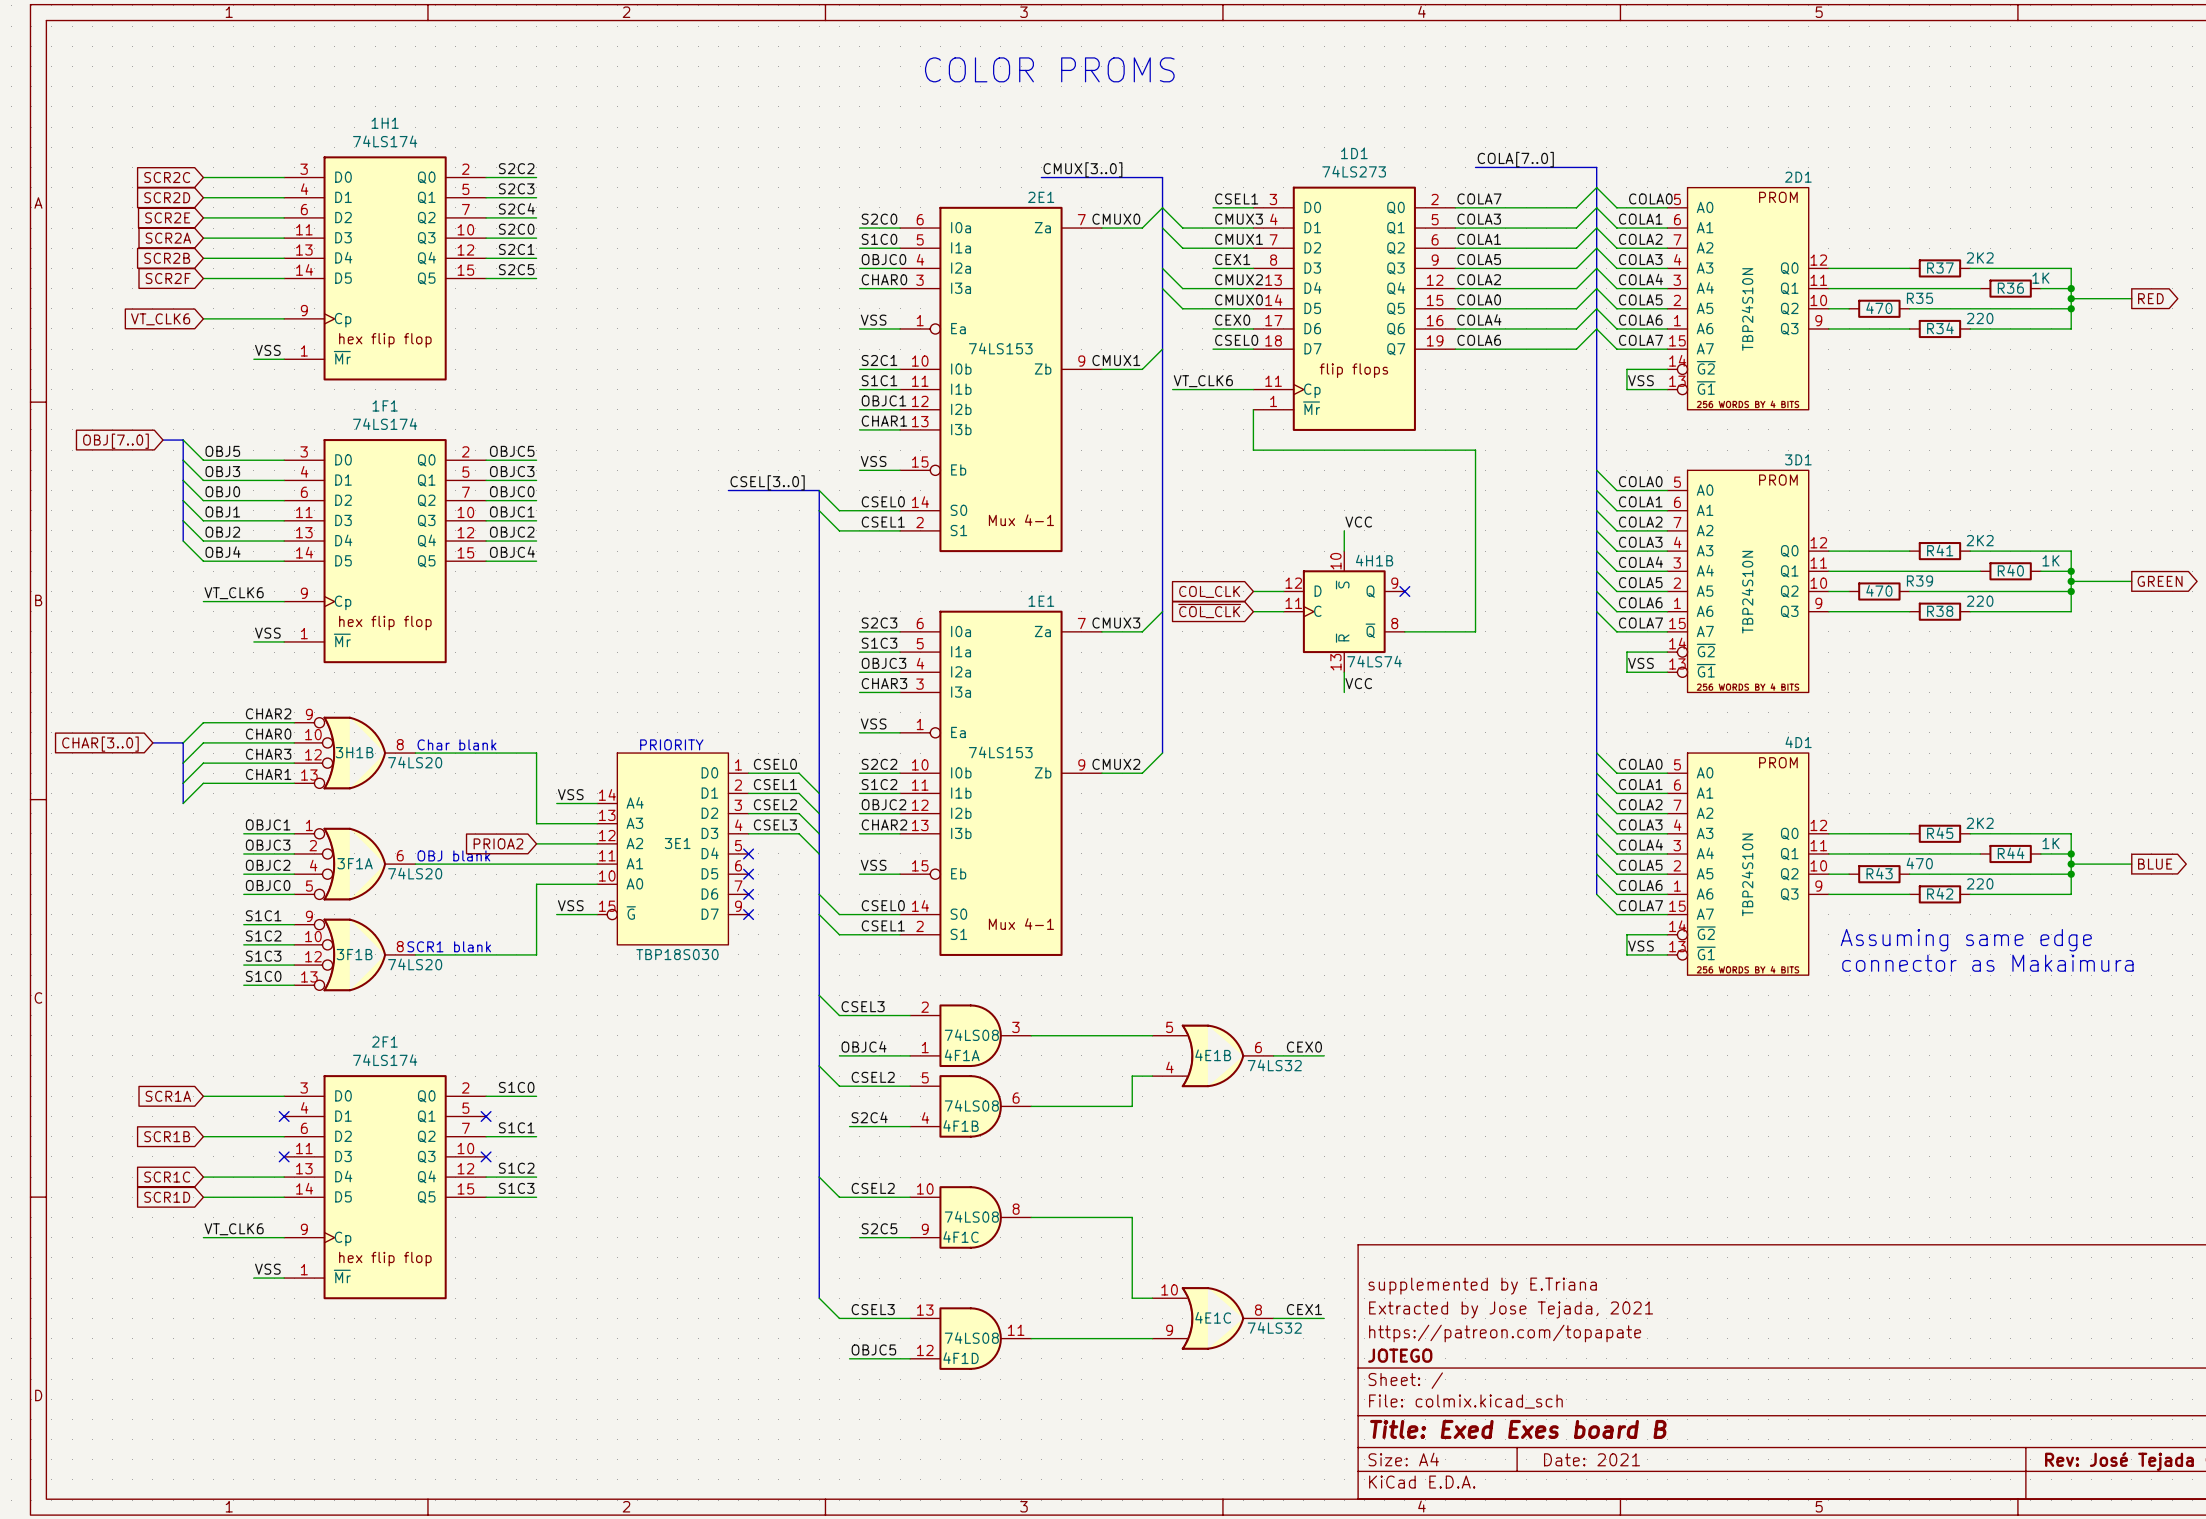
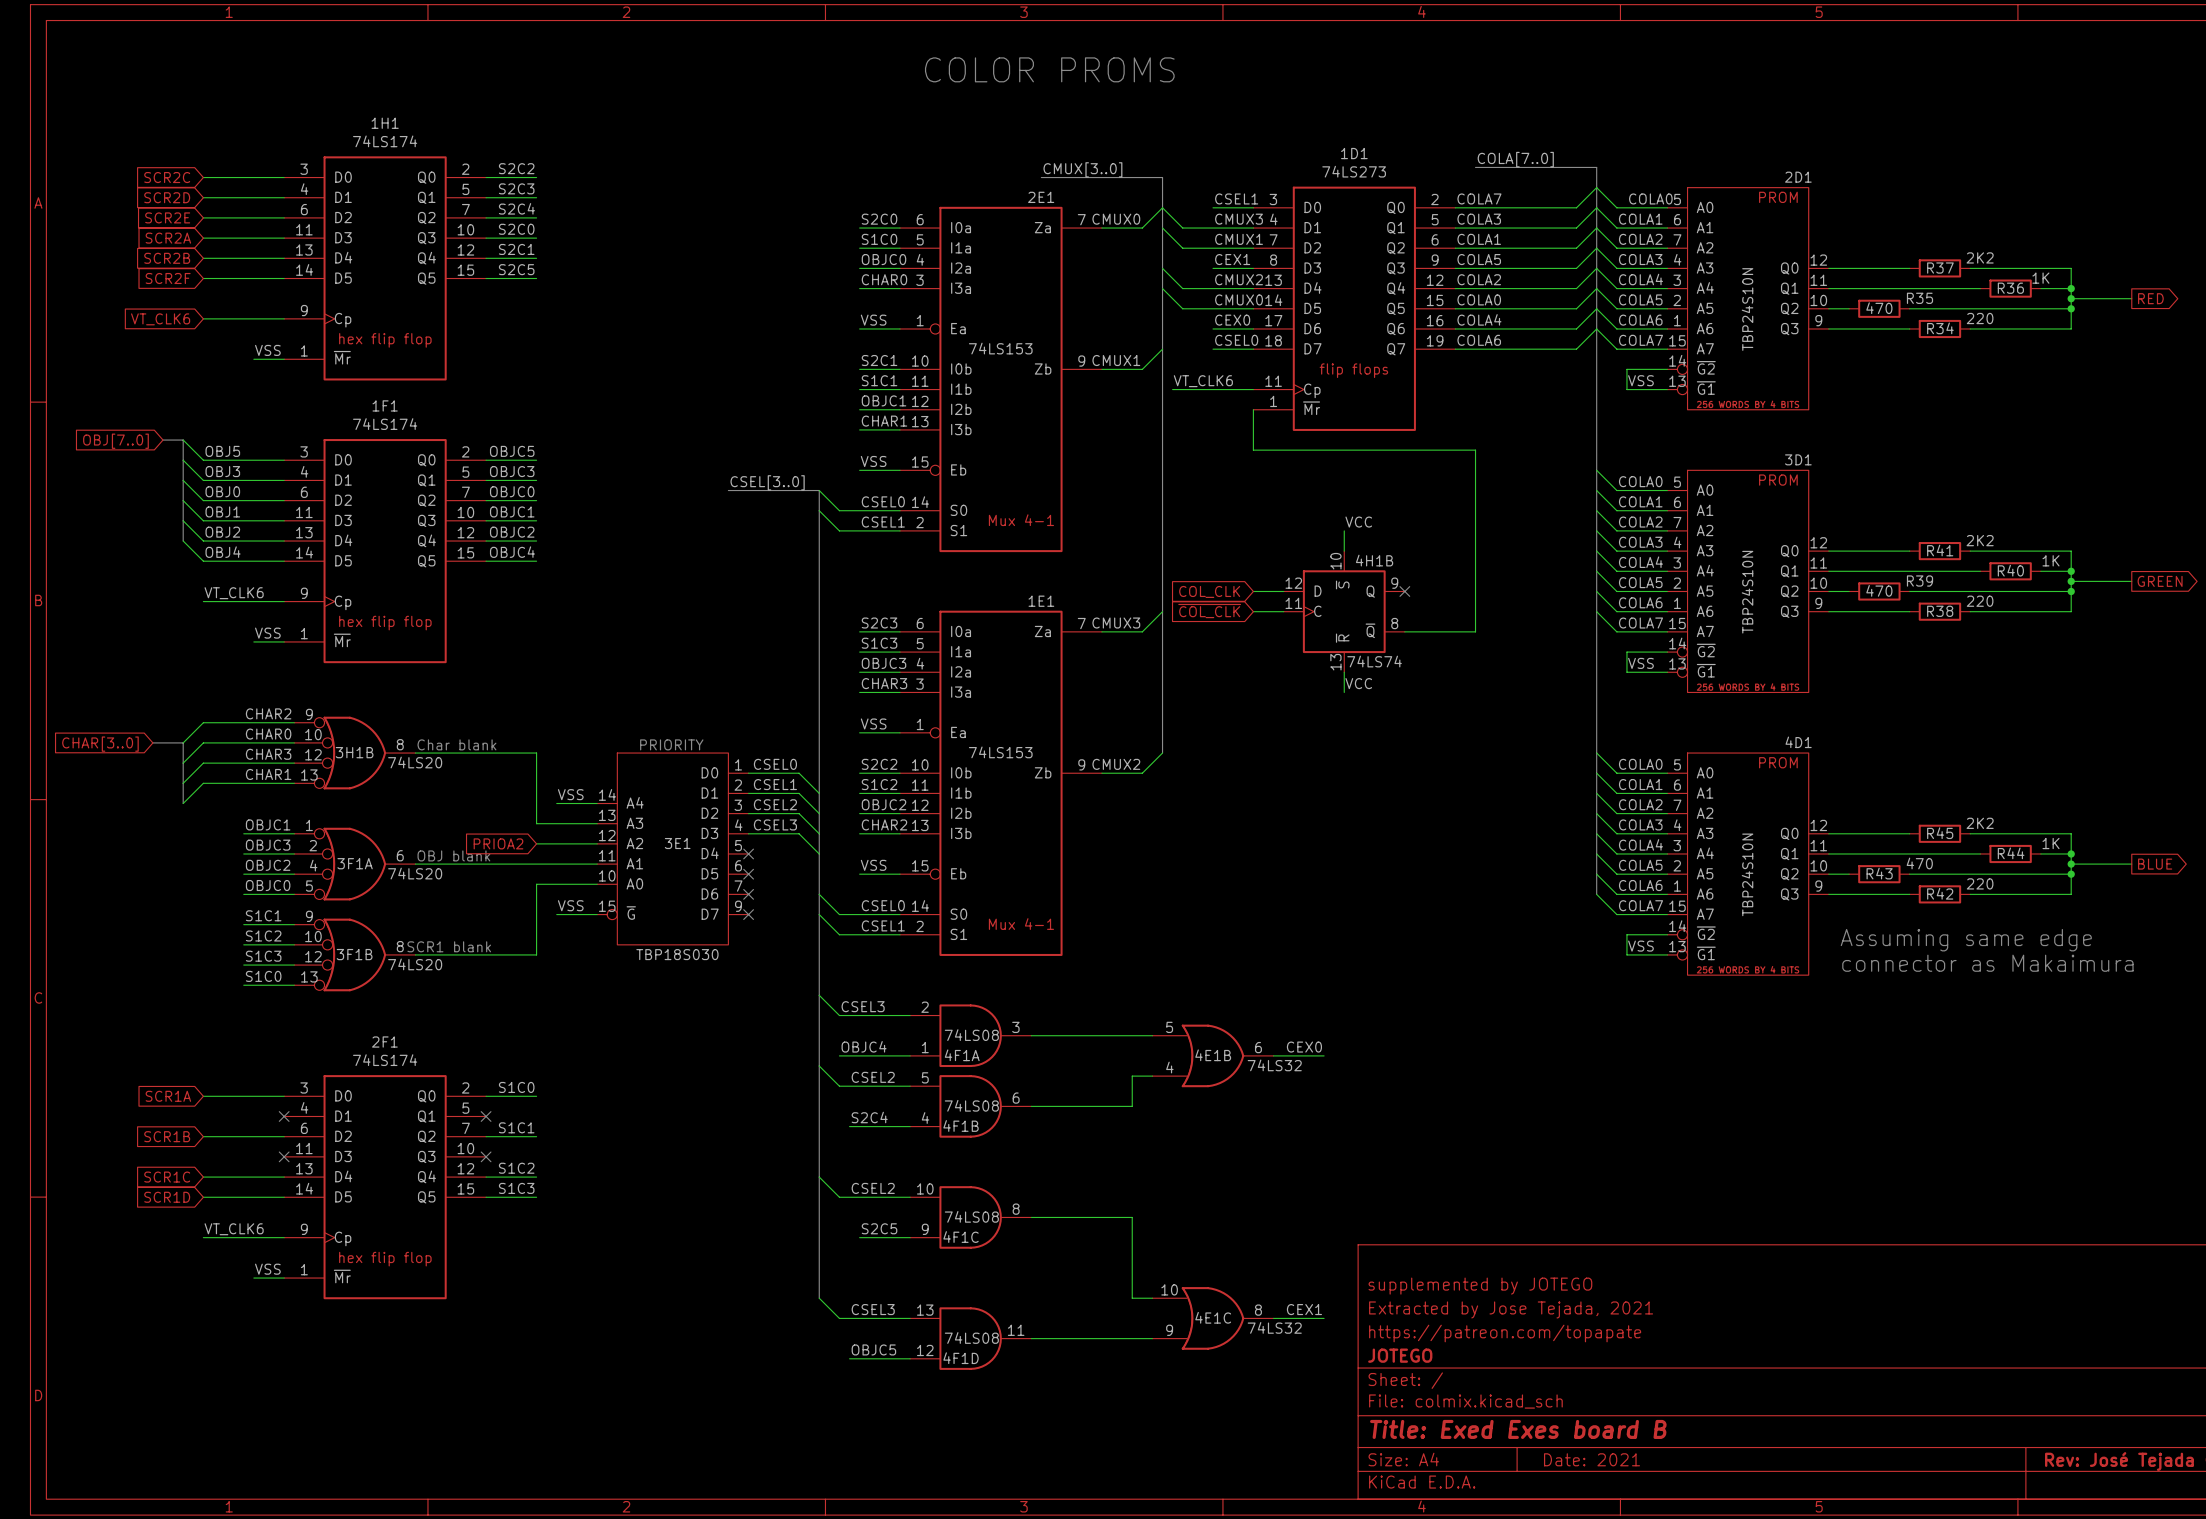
title block: supplemented by E.Triana (1482, 1286) -> supplemented by JOTEGO (1480, 1286)

